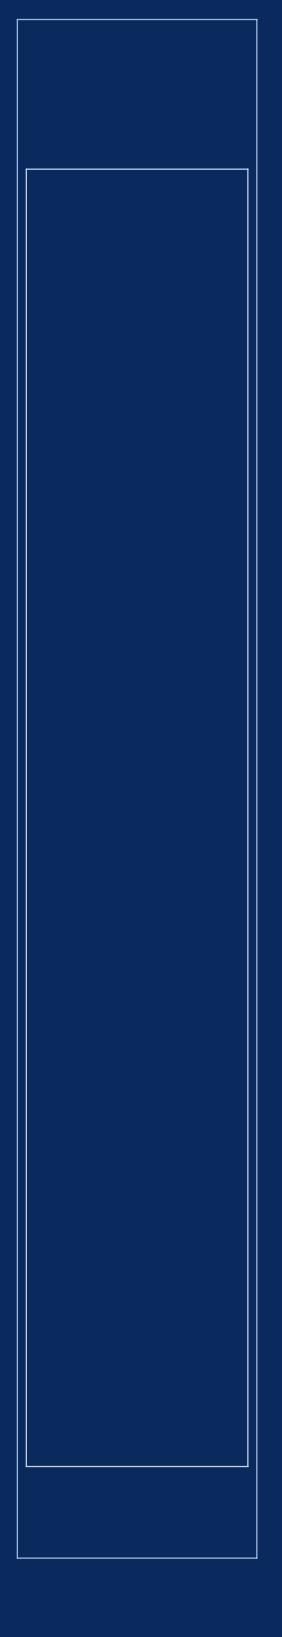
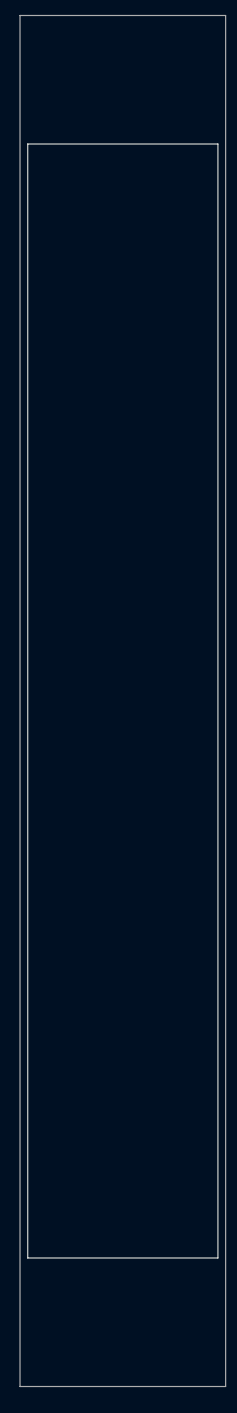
line: (17, 1558) (256, 1558) -> (20, 1336) (20, 1386) (225, 1386) (225, 1336)

